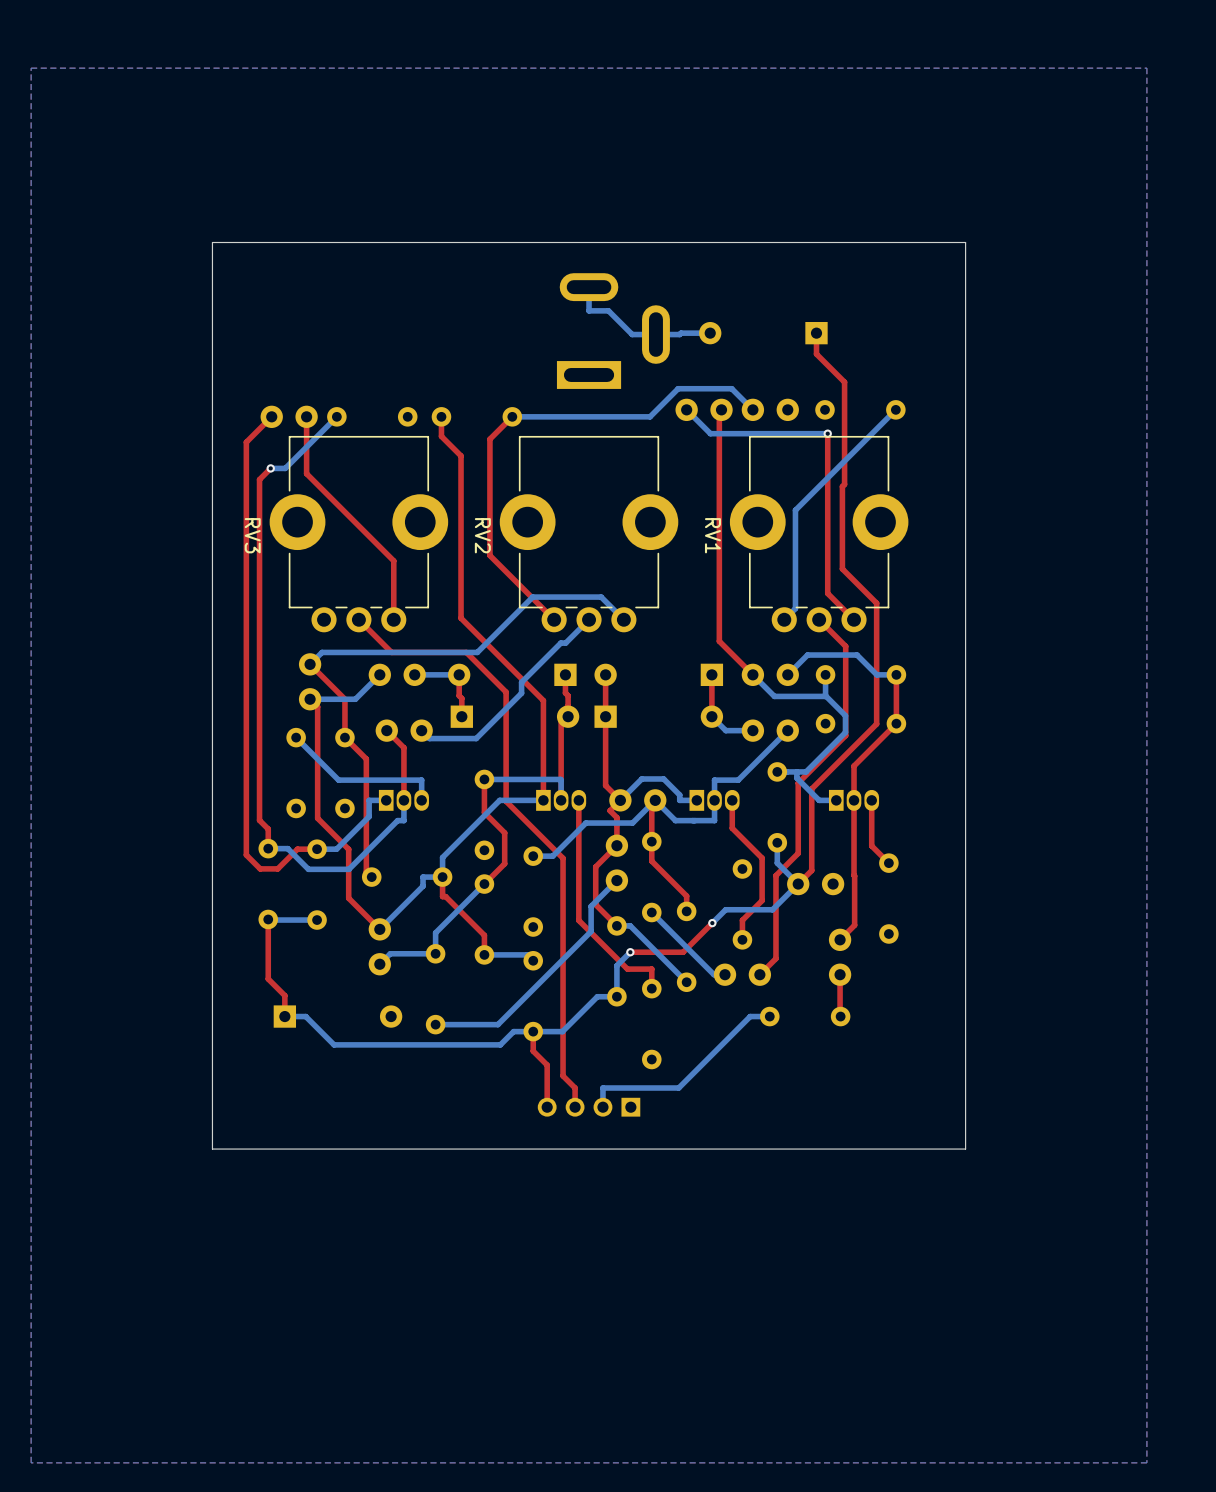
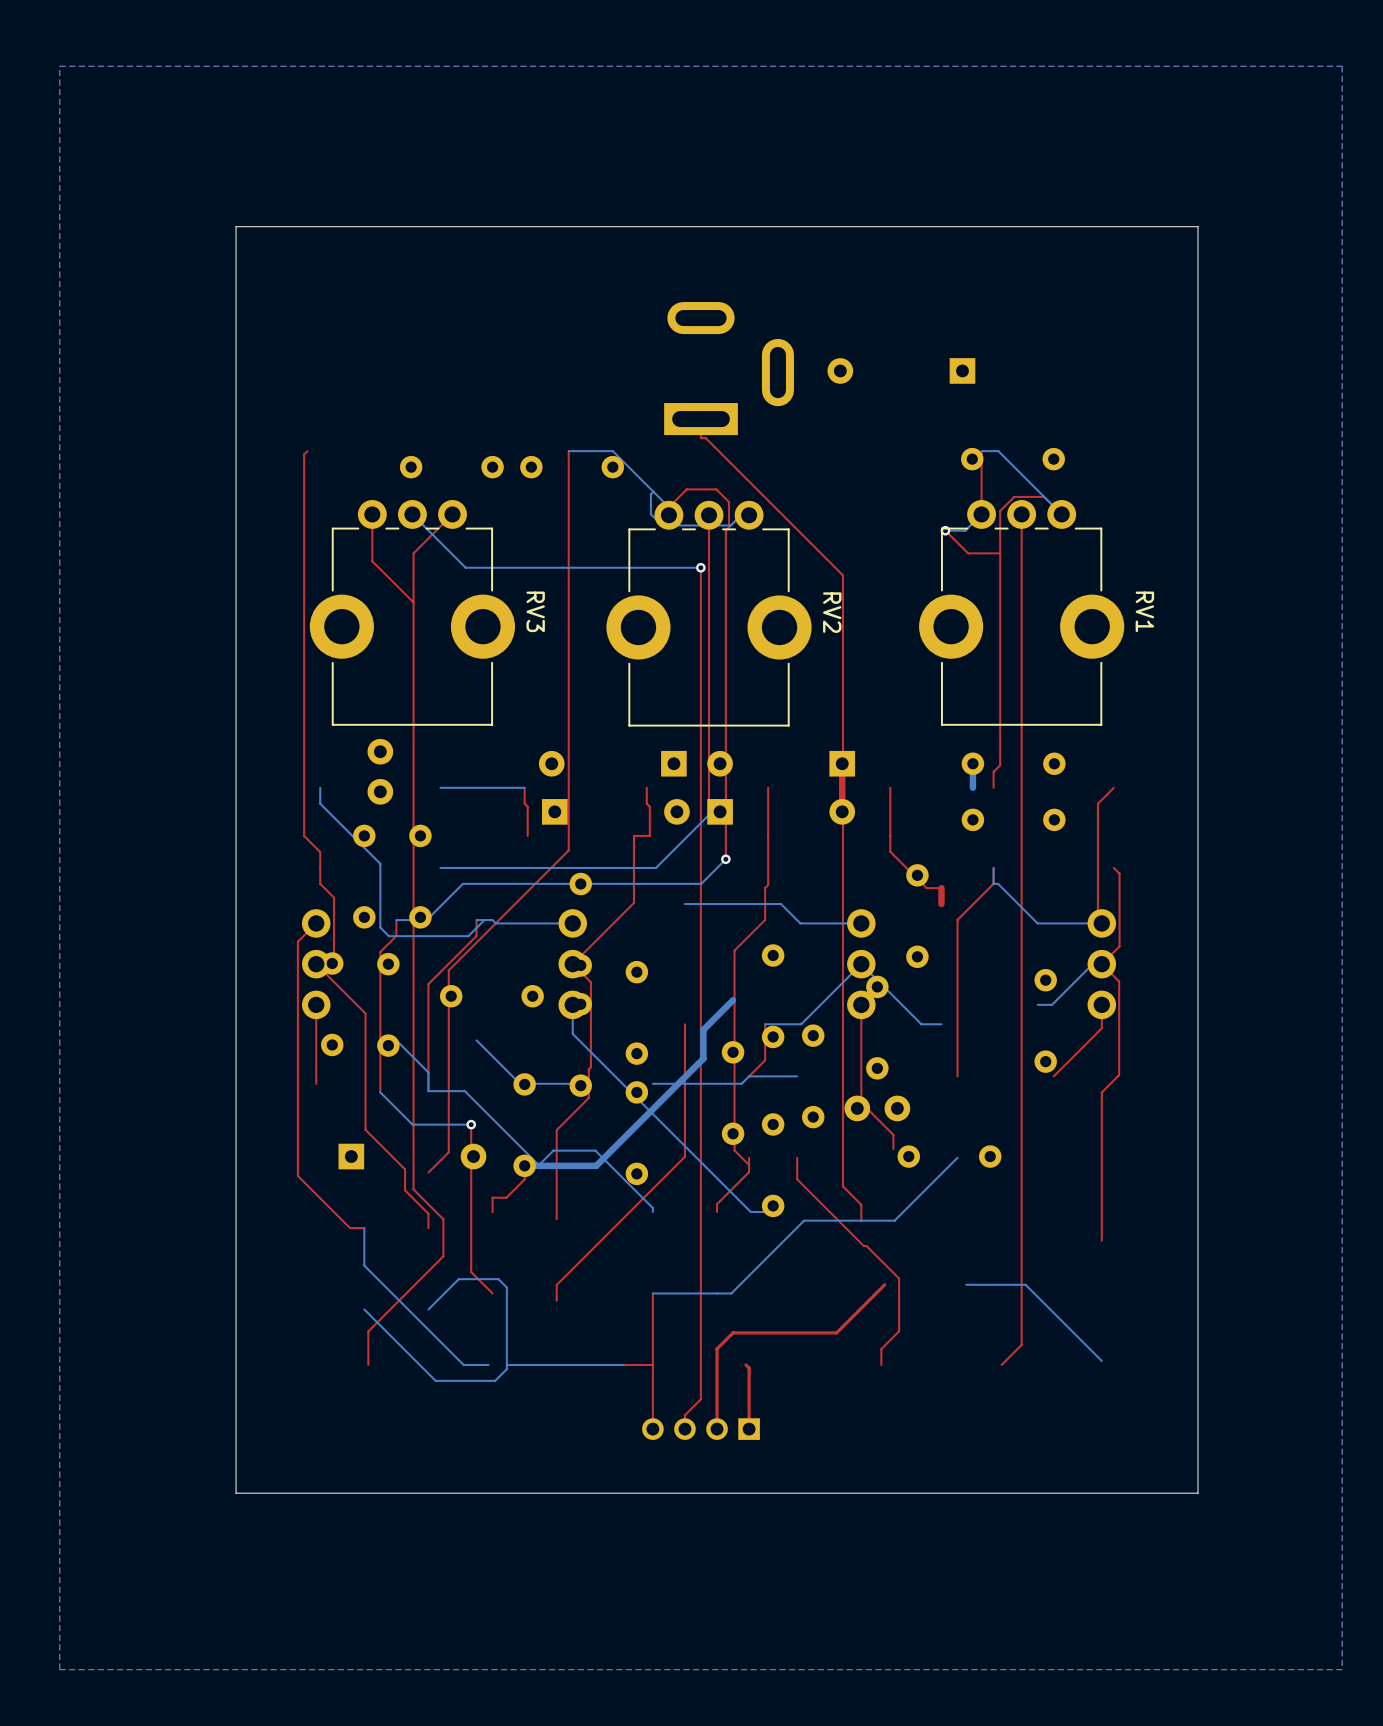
board edge: (965, 242) (212, 242) (212, 1149) (965, 1149) (965, 242) -> (1198, 226) (1198, 1493) (236, 1493) (236, 226) (1198, 226)
bottom track: (589, 287) (589, 310) (608, 310) (632, 334) (710, 333) -> none
top track: (816, 333) (816, 354) (844, 382) (842, 568) (876, 603) (876, 724) (811, 788) (811, 870) (798, 884) -> none
top track: none -> (701, 419) (701, 438) (705, 438) (842, 575) (842, 1186) (861, 1204) (861, 1220)
top track: none -> (307, 451) (304, 454) (304, 835) (320, 852) (320, 883) (334, 897) (334, 961) (323, 971)
top track: none -> (568, 451) (568, 850) (448, 970) (448, 1152) (428, 1172)
bottom track: none -> (568, 451) (612, 451) (653, 491)
top track: none -> (982, 451) (981, 514)
bottom track: none -> (982, 451) (998, 451) (1061, 514)
bottom track: (686, 409) (710, 433) (827, 433) -> none
part: (704, 409) -> none
top track: (721, 409) (719, 412) (719, 641) (752, 674) -> none
bottom track: (752, 409) (731, 388) (678, 388) (650, 416) (512, 416) -> none
part: (770, 409) -> none
bottom track: (895, 409) (795, 510) (795, 608) (784, 619) -> none
top track: (271, 416) (246, 442) (246, 855) (260, 868) (277, 868) (297, 849) (317, 849) -> none
part: (289, 416) -> none
top track: (306, 416) (306, 473) (393, 560) (393, 619) -> none
bottom track: (336, 416) (285, 468) (270, 468) -> none
top track: (441, 416) (441, 436) (461, 455) (461, 618) (543, 700) (543, 800) -> none
top track: (512, 416) (489, 439) (489, 555) (554, 619) -> none
top track: (827, 433) (827, 593) (854, 619) -> none
via position: (827, 433) -> (945, 530)
bottom track: none -> (653, 491) (650, 494) (650, 514) (662, 525) (730, 525) (749, 507)
bottom track: none -> (653, 491) (668, 507)
top track: none -> (709, 507) (709, 814)
top track: none -> (749, 507) (725, 530) (725, 859)
top track: none -> (372, 514) (372, 561) (413, 602)
bottom track: none -> (412, 514) (465, 567) (700, 567)
top track: none -> (452, 514) (413, 553) (413, 1189) (443, 1219) (443, 1256) (368, 1331) (368, 1364)
bottom track: none -> (981, 514) (965, 530) (945, 530)
top track: none -> (1021, 514) (1021, 1344) (1001, 1364)
top track: none -> (1061, 514) (1044, 496) (1014, 496) (1000, 510) (1000, 765) (993, 771) (993, 787)
top track: none -> (668, 515) (668, 507) (686, 489) (716, 489) (729, 502) (729, 527)
top track: (270, 468) (259, 479) (259, 820) (268, 829) (268, 848) -> none
via: (270, 468) -> none
top track: none -> (945, 530) (968, 553) (1000, 553)
top track: none -> (700, 567) (700, 1399) (684, 1415) (684, 1429)
via: none -> (700, 567)
RV3 rotation: 0° (358, 534) -> 180° (412, 612)
RV2 rotation: 0° (589, 534) -> 180° (709, 613)
RV1 rotation: 0° (819, 534) -> 180° (1021, 612)
top track: (358, 619) (391, 652) (466, 652) (506, 692) (506, 801) (563, 858) (563, 1075) (575, 1088) (575, 1107) -> none
bottom track: (589, 619) (565, 643) (560, 643) (521, 682) (521, 693) (476, 738) (429, 738) (421, 730) -> none
bottom track: (623, 619) (601, 597) (532, 597) (477, 652) (322, 652) (310, 664) -> none
top track: (819, 619) (845, 646) (845, 735) (798, 783) (798, 853) (775, 875) (775, 958) (759, 974) -> none
top track: (310, 664) (344, 699) (344, 737) (366, 759) (366, 871) (371, 877) -> none
bottom track: (379, 674) (355, 699) (310, 699) -> none
part: (397, 674) -> none
top track: (459, 674) (461, 716) -> none
bottom track: (459, 674) (414, 674) -> none
top track: (565, 674) (568, 716) -> none
top track: (605, 674) (605, 785) (620, 800) (610, 810) (616, 817) (616, 845) (595, 866) (595, 904) (616, 925) -> none
bottom track: (752, 674) (774, 696) (825, 695) (845, 715) (845, 732) (806, 771) (777, 771) -> none
part: (770, 674) -> none
top track: (896, 674) (896, 723) (854, 766) (854, 925) (840, 939) -> none
bottom track: (896, 674) (876, 674) (857, 655) (807, 655) (787, 674) -> none
bottom track: none -> (320, 787) (320, 803) (380, 863) (380, 927) (388, 936) (468, 936) (484, 920)
top track: none -> (524, 787) (524, 803) (527, 806) (527, 835)
bottom track: none -> (524, 787) (440, 787)
top track: none -> (646, 787) (646, 803) (649, 806) (649, 835) (633, 835) (633, 902) (572, 964) (590, 982) (590, 1067) (588, 1069) (588, 1098) (556, 1130) (556, 1219)
top track: none -> (768, 787) (768, 885) (765, 888) (765, 919) (734, 950) (734, 1150) (749, 1164)
top track: none -> (890, 787) (890, 851) (926, 888) (941, 888) (941, 904)
top track: none -> (1113, 787) (1097, 803) (1097, 919) (1101, 923)
top track: (310, 699) (317, 706) (317, 818) (348, 849) (348, 898) (379, 929) -> none
top track: (568, 706) (561, 713) (561, 800) -> none
bottom track: (711, 716) (725, 730) (752, 730) -> none
bottom track: none -> (709, 814) (655, 867) (440, 867)
top track: (386, 730) (403, 747) (403, 800) -> none
part: (404, 730) -> none
part: (770, 730) -> none
bottom track: (787, 730) (738, 780) (714, 780) (714, 820) (675, 820) (655, 800) (632, 823) (585, 823) (552, 856) (533, 856) -> none
bottom track: (296, 737) (338, 780) (421, 780) (421, 800) -> none
bottom track: none -> (725, 859) (701, 883) (462, 883) (426, 920) (396, 920)
via: none -> (725, 859)
top track: none -> (993, 867) (993, 883) (957, 919) (957, 1076)
bottom track: none -> (993, 867) (993, 883) (998, 883) (1037, 923) (1101, 923)
top track: none -> (1113, 867) (1119, 873) (1119, 946) (1101, 964) (1119, 981) (1119, 1075) (1101, 1092) (1101, 1240)
bottom track: (796, 771) (796, 778) (819, 800) (836, 800) -> none
top track: (484, 779) (484, 812) (504, 832) (504, 863) (484, 884) -> none
bottom track: (484, 779) (560, 779) (561, 800) -> none
bottom track: none -> (684, 904) (781, 904) (800, 923) (861, 923)
bottom track: (386, 800) (369, 800) (369, 816) (336, 849) (317, 849) -> none
bottom track: (403, 800) (403, 820) (397, 820) (348, 869) (308, 869) (287, 848) (268, 848) -> none
part: (403, 800) -> none
bottom track: (543, 800) (499, 800) (442, 857) (442, 877) (423, 877) (423, 886) (379, 929) -> none
part: (561, 800) -> none
top track: (578, 800) (578, 920) (627, 969) (651, 969) (651, 988) -> none
part: (637, 800) -> none
top track: (655, 800) (651, 803) (651, 861) (686, 896) (686, 911) -> none
bottom track: (696, 800) (679, 800) (679, 795) (663, 778) (641, 778) (620, 800) -> none
part: (714, 800) -> none
top track: (732, 800) (732, 828) (762, 858) (762, 900) (742, 920) (742, 939) -> none
part: (854, 800) -> none
top track: (871, 800) (871, 845) (888, 863) -> none
top track: none -> (396, 920) (396, 935) (380, 952) (380, 1092)
top track: none -> (476, 920) (476, 935) (428, 984) (428, 1091)
bottom track: none -> (476, 920) (492, 920) (495, 923) (572, 923)
top track: none -> (316, 923) (297, 941) (297, 1175) (350, 1228) (364, 1228)
bottom track: (777, 842) (777, 863) (798, 884) (772, 909) (725, 909) (712, 923) -> none
top track: none -> (316, 964) (365, 1013) (365, 1129) (405, 1169) (405, 1190) (428, 1213) (428, 1228)
part: none -> (316, 964)
part: none -> (572, 964)
part: none -> (861, 964)
bottom track: none -> (1101, 964) (1092, 964) (1051, 1004) (1037, 1004)
part: none -> (1101, 964)
part: (616, 863) -> none
top track: (442, 877) (442, 896) (445, 896) (484, 935) (484, 954) -> none
top track: none -> (316, 1004) (316, 1083)
bottom track: none -> (572, 1004) (572, 1033) (750, 1212) (765, 1212)
bottom track: (484, 884) (435, 932) (435, 953) (390, 953) (379, 964) -> none
top track: none -> (861, 1004) (861, 1102) (893, 1134) (893, 1149)
part: (815, 884) -> none
top track: none -> (1101, 1004) (1101, 1028) (1053, 1076)
top track: none -> (684, 1024) (684, 1156) (556, 1284) (556, 1300)
top track: none -> (765, 1024) (765, 1060) (749, 1076)
bottom track: none -> (941, 1024) (921, 1024) (861, 964) (801, 1024) (765, 1024)
bottom track: (651, 912) (713, 974) (725, 974) -> none
bottom track: none -> (396, 1040) (428, 1072) (428, 1091) (464, 1091) (538, 1165) (553, 1150) (595, 1150) (652, 1208) (652, 1212)
bottom track: none -> (476, 1040) (519, 1083) (588, 1083)
top track: (268, 919) (268, 979) (284, 995) (284, 1016) -> none
bottom track: (268, 919) (317, 920) -> none
top track: (712, 923) (683, 952) (630, 952) -> none
via: (712, 923) -> none
bottom track: (616, 925) (630, 925) (686, 982) -> none
part: (379, 946) -> none
bottom track: none -> (797, 1076) (749, 1076) (741, 1083) (652, 1083)
bottom track: (630, 952) (616, 965) (616, 996) (597, 996) (562, 1031) (513, 1031) (500, 1044) (334, 1044) (305, 1016) (284, 1016) -> none
via: (630, 952) -> none
bottom track: (484, 954) (527, 954) (533, 960) -> none
part: (840, 957) -> none
bottom track: none -> (380, 1092) (412, 1124) (471, 1124)
top track: (840, 974) (840, 1016) -> none
top track: none -> (471, 1124) (471, 1272) (492, 1293)
via: none -> (471, 1124)
bottom track: (769, 1016) (750, 1016) (678, 1088) (602, 1088) (602, 1107) -> none
top track: none -> (749, 1157) (749, 1172) (717, 1204) (717, 1212)
top track: none -> (797, 1157) (797, 1179) (899, 1278) (899, 1331) (881, 1349) (881, 1364)
bottom track: none -> (957, 1157) (894, 1220) (804, 1220) (731, 1293) (652, 1293)
top track: none -> (524, 1165) (524, 1179) (506, 1197) (492, 1197) (492, 1212)
top track: (533, 1031) (533, 1051) (547, 1065) (547, 1107) -> none
bottom track: none -> (364, 1228) (364, 1265) (463, 1364) (488, 1364)
part position: (589, 1107) -> (701, 1429)
top track: none -> (884, 1284) (836, 1332) (733, 1332) (717, 1348) (717, 1429)
bottom track: none -> (966, 1284) (1025, 1284) (1101, 1360)
top track: none -> (652, 1293) (652, 1429)
bottom track: none -> (428, 1309) (458, 1279) (498, 1279) (506, 1287) (506, 1369) (495, 1380) (435, 1380) (364, 1309)
bottom track: none -> (623, 1364) (506, 1364)
top track: none -> (652, 1364) (623, 1364)
top track: none -> (746, 1364) (749, 1368) (749, 1429)

